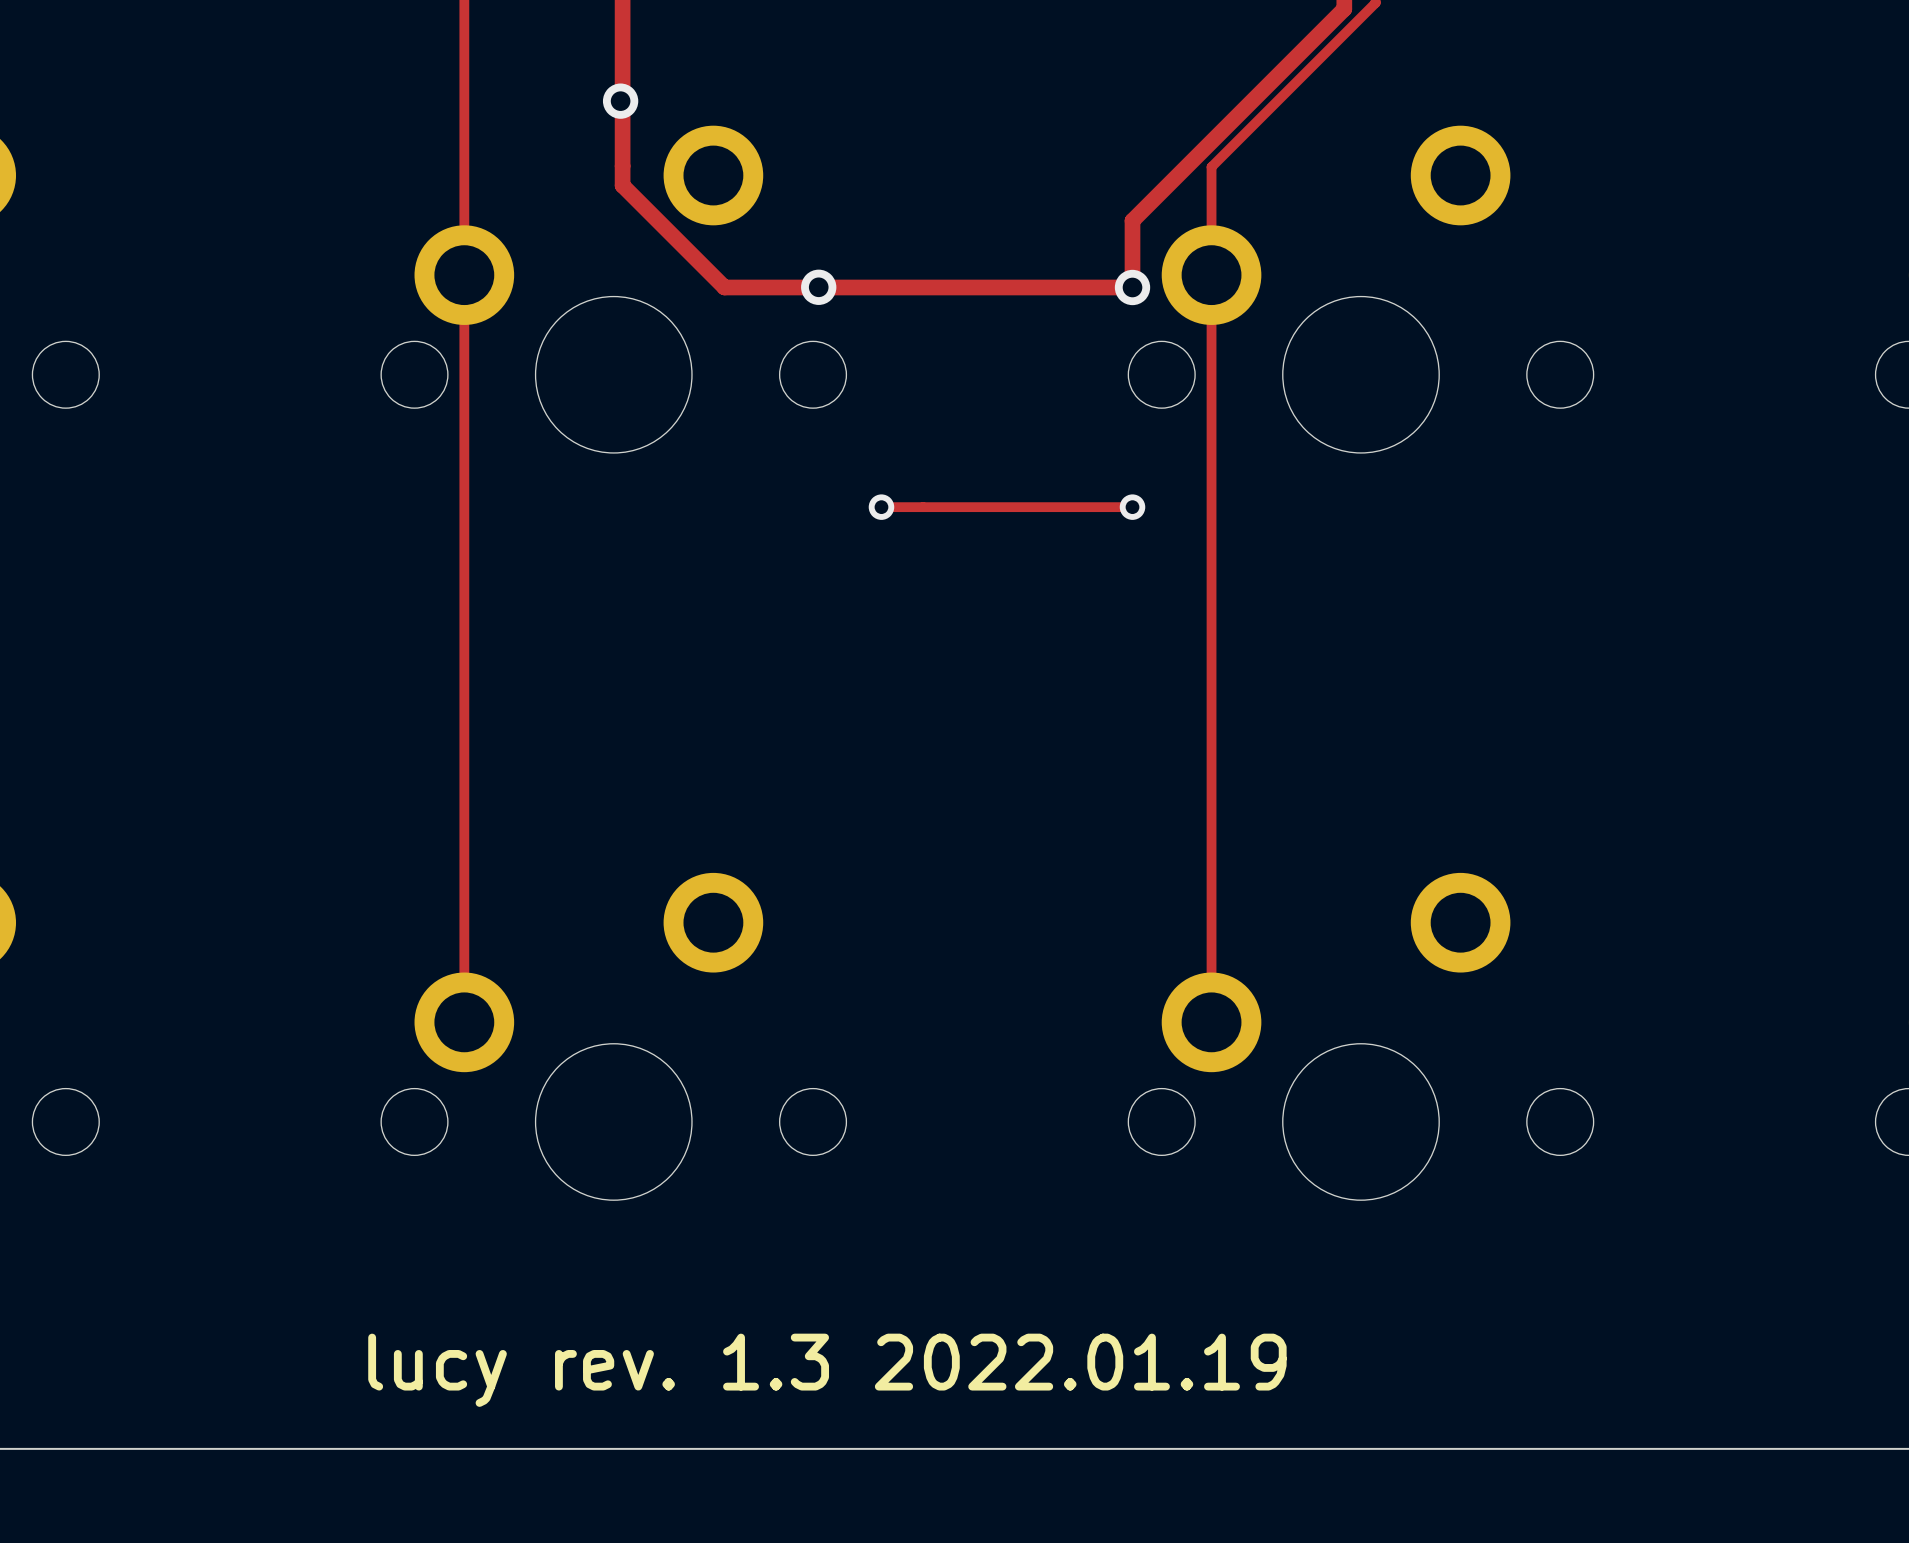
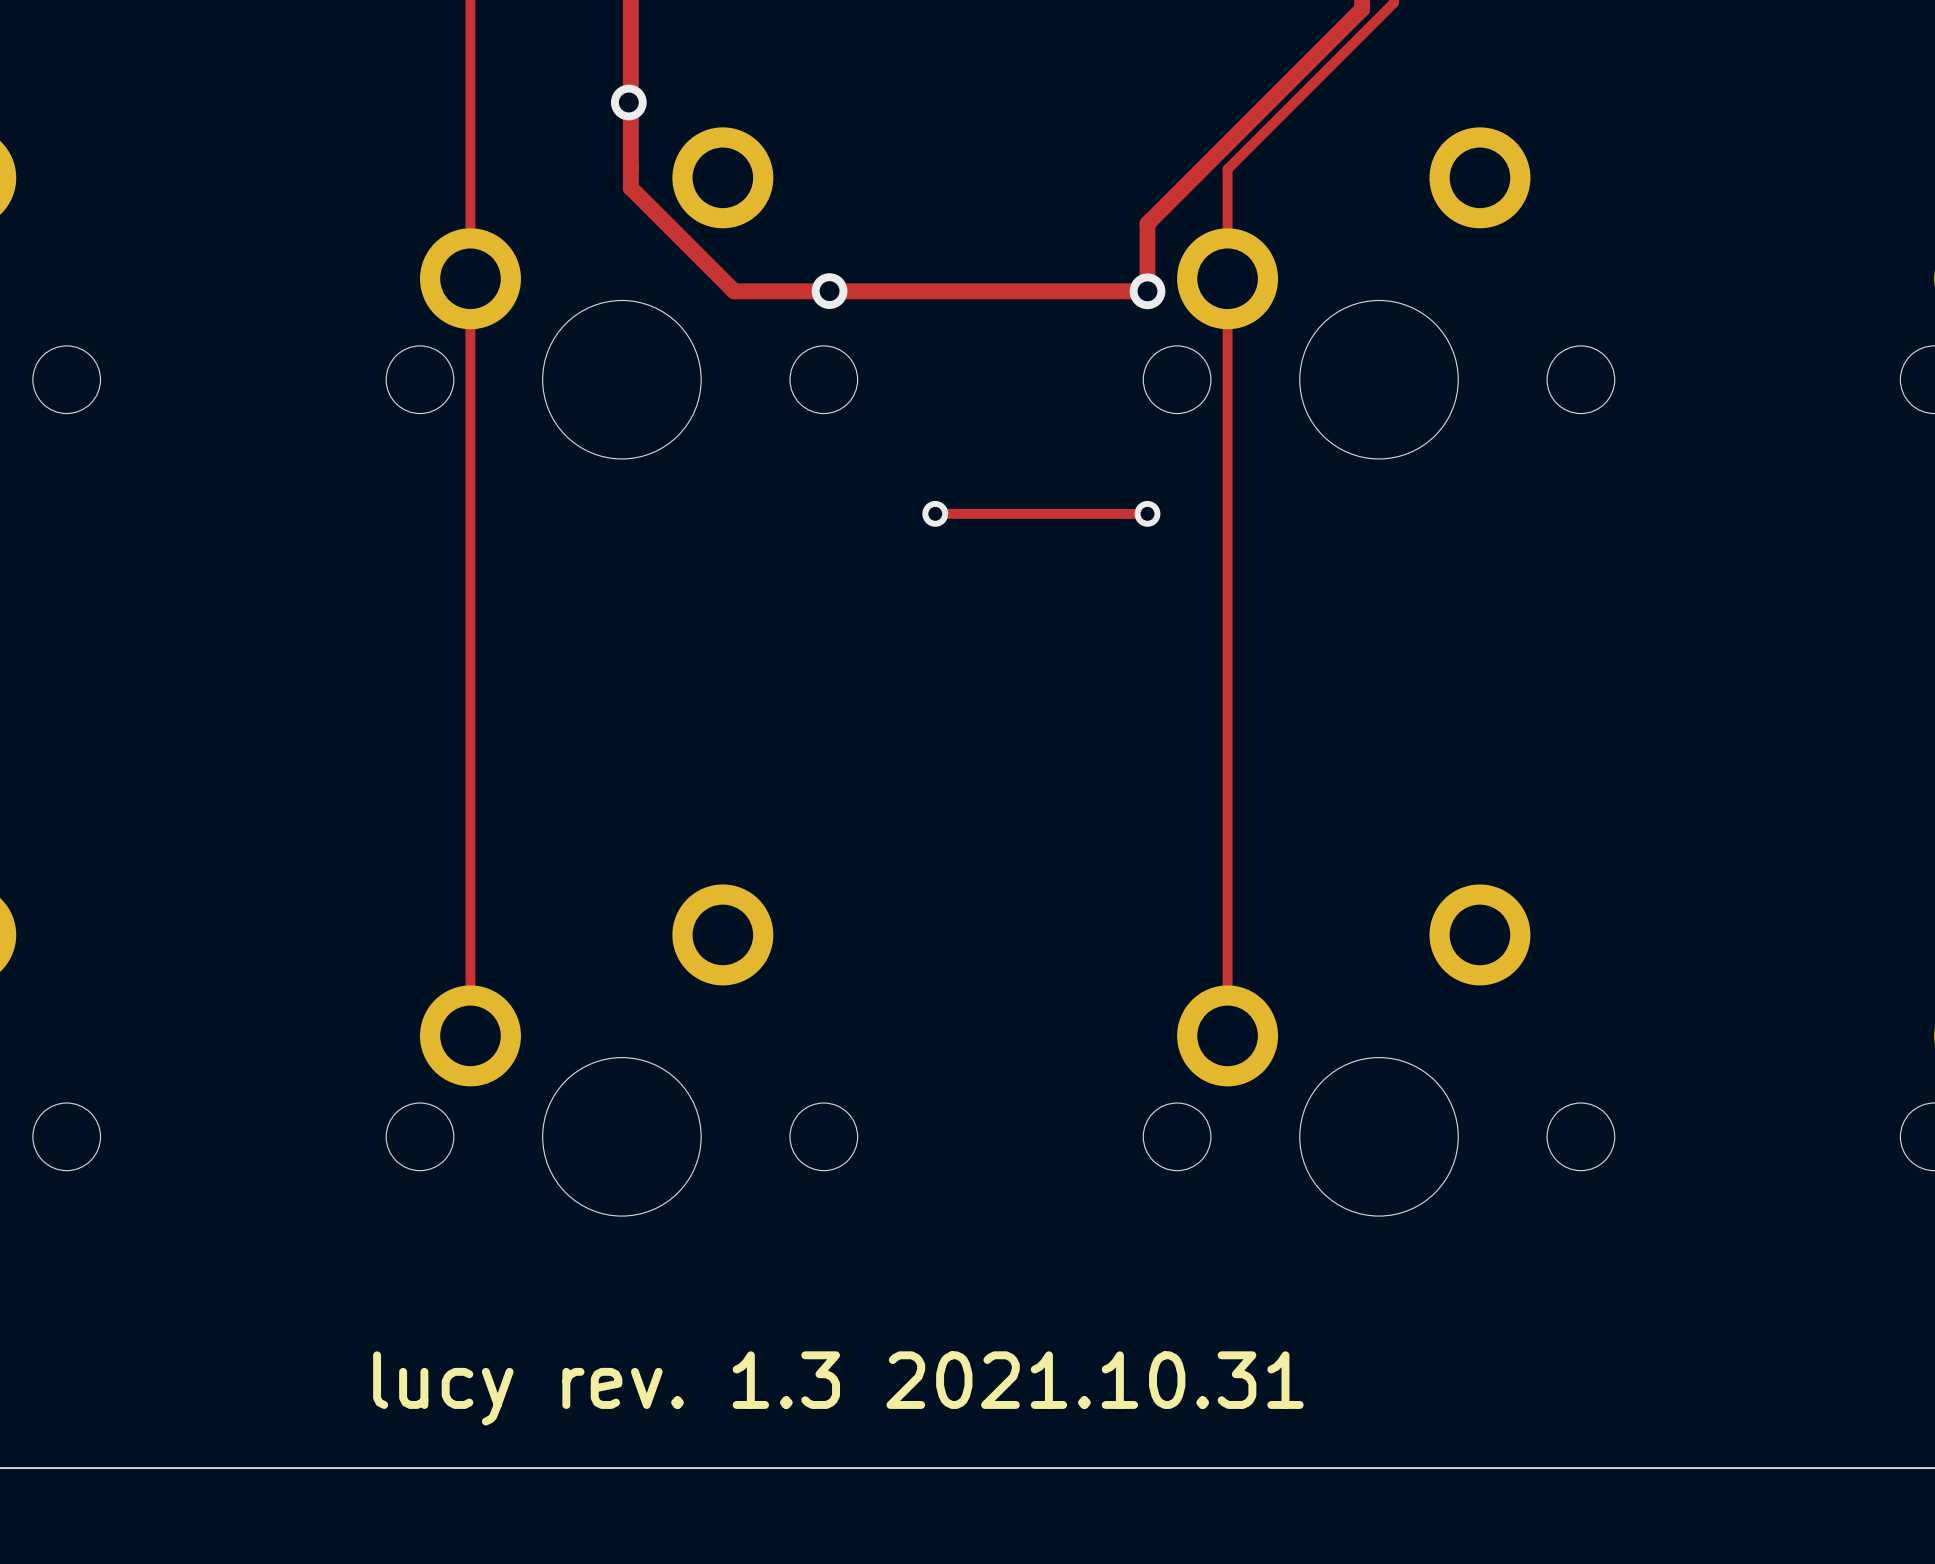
track: (881, 507) (923, 507) -> none
via position: (881, 507) -> (935, 513)
text: lucy rev. 1.3 2022.01.19 (827, 1370) -> lucy rev. 1.3 2021.10.31 (838, 1388)

